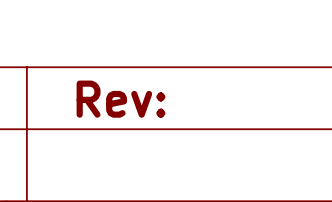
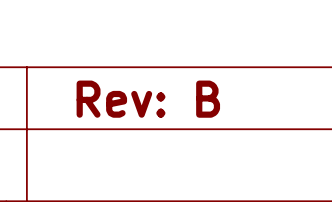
title block: Rev: (121, 99) -> Rev: B (148, 99)

